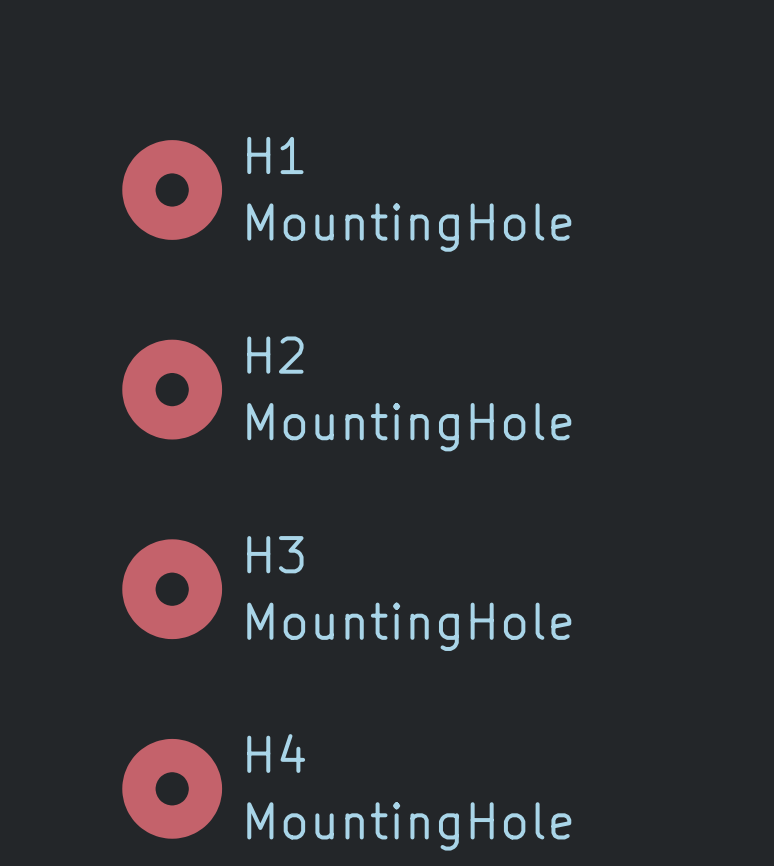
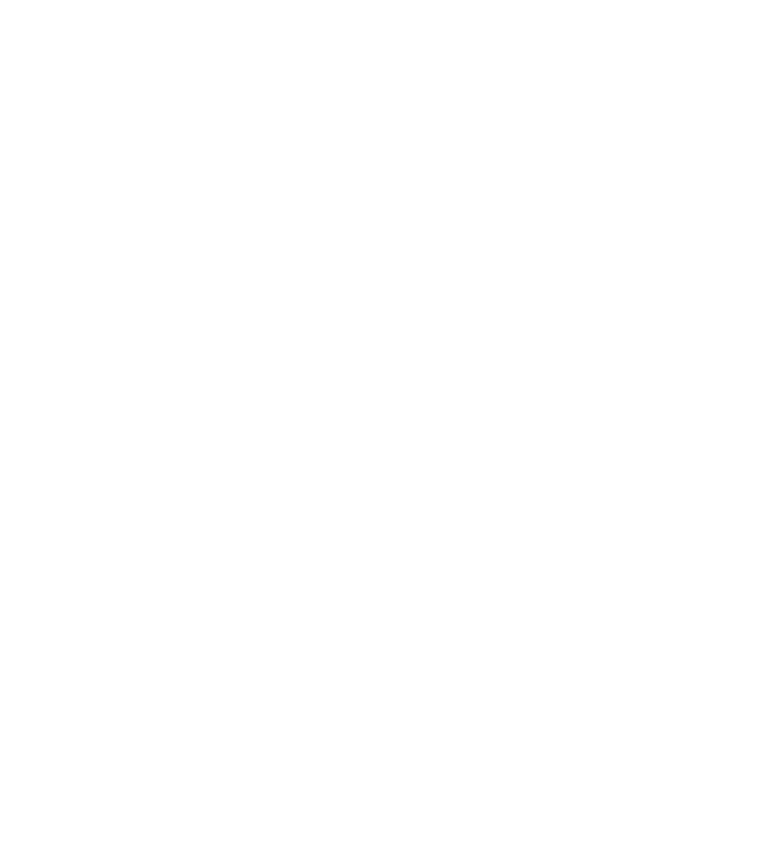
H1: MountingHole (172, 189) -> none
H2: MountingHole (172, 389) -> none
H3: MountingHole (172, 589) -> none
H4: MountingHole (172, 788) -> none

